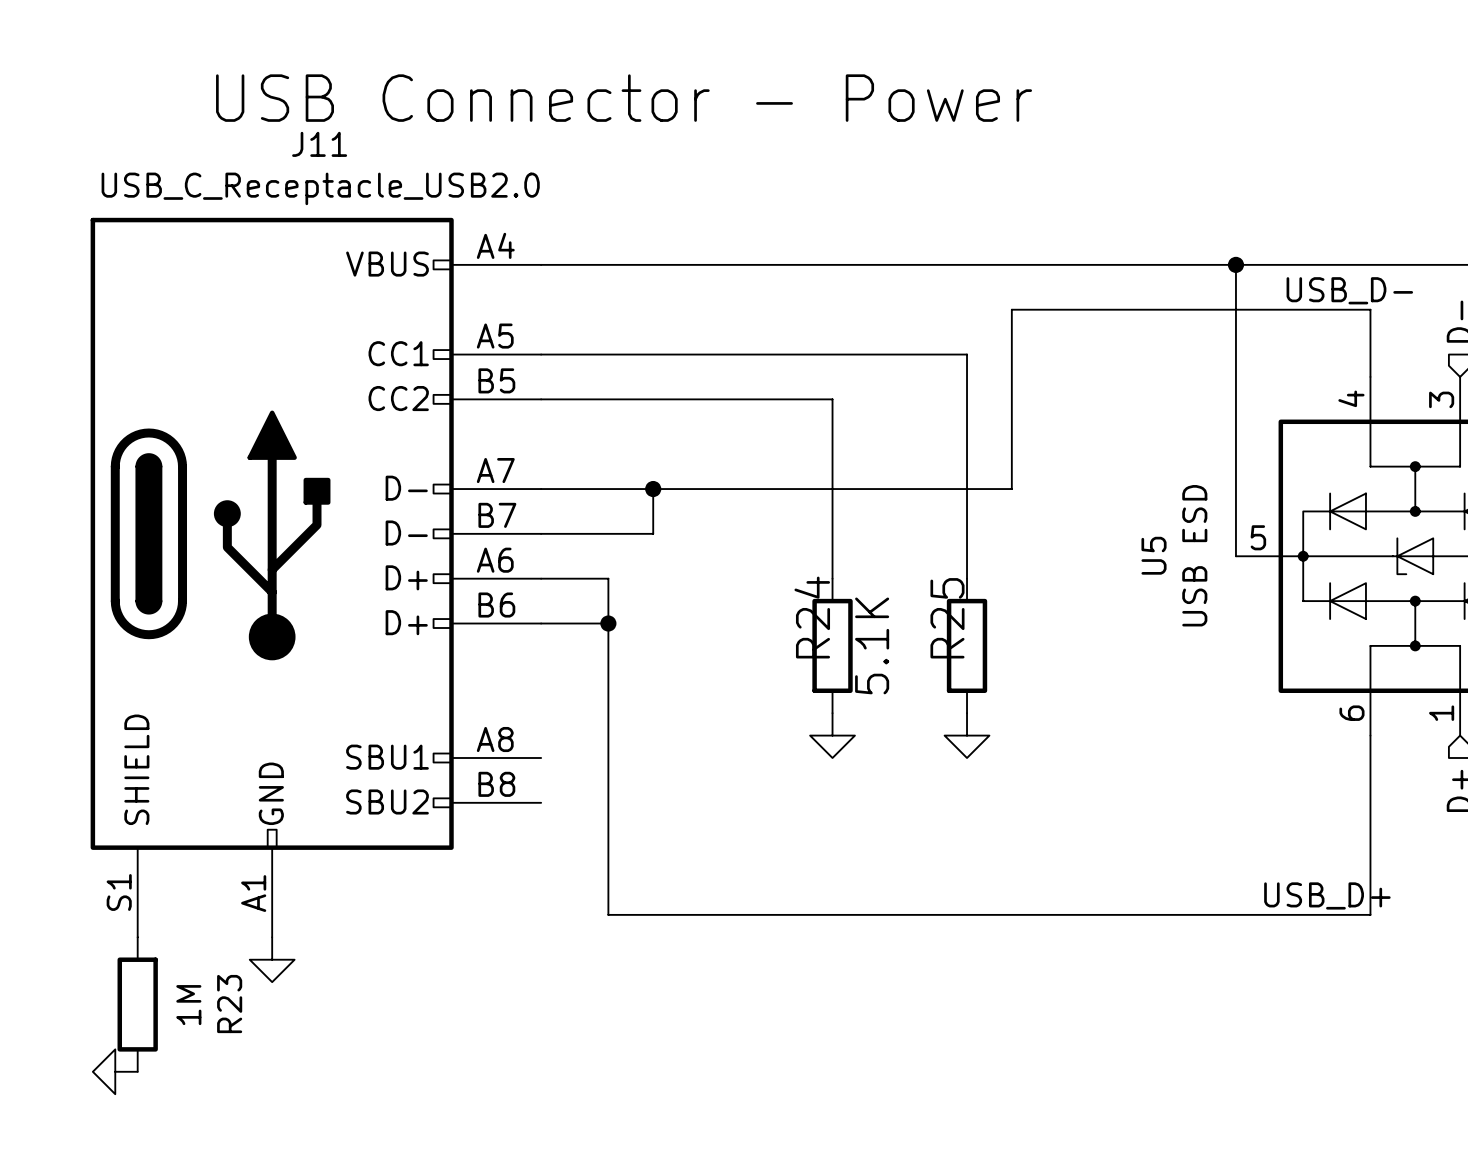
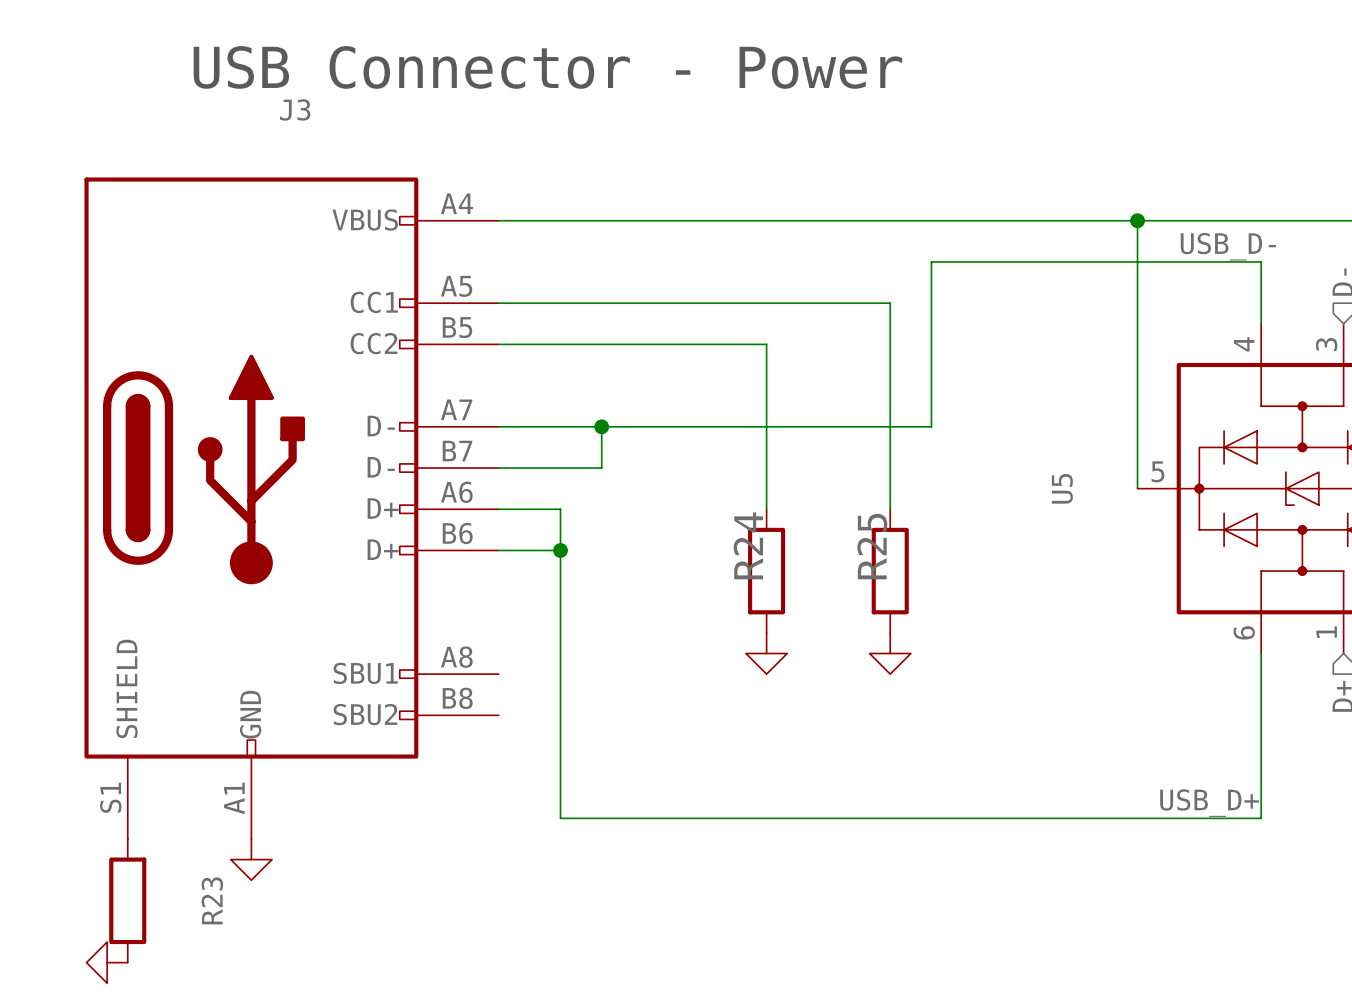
J11 name: J11 (319, 144) -> J3 (295, 109)
J11 value: USB_C_Receptacle_USB2.0 (320, 188) -> none
U5 value: USB ESD (1194, 555) -> none
R24 value: 5.1K (872, 645) -> none
R23 value: 1M (188, 1005) -> none

